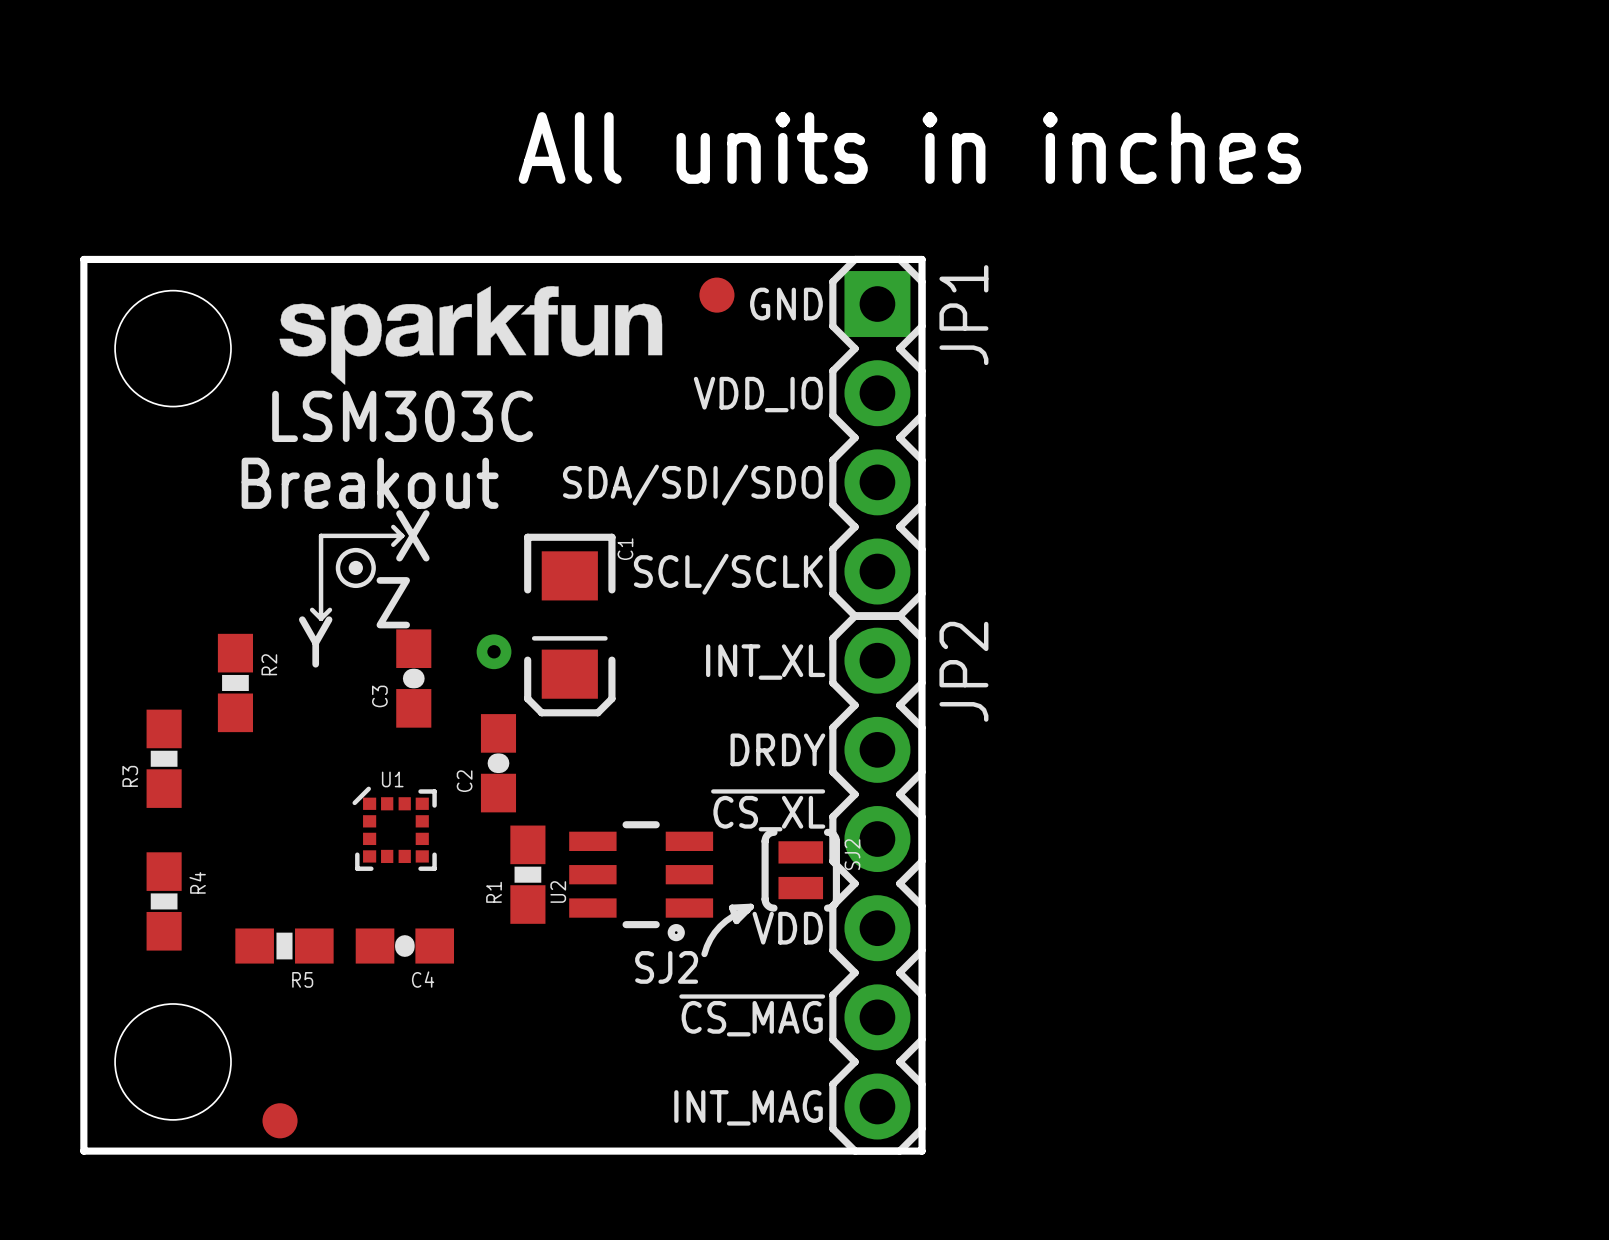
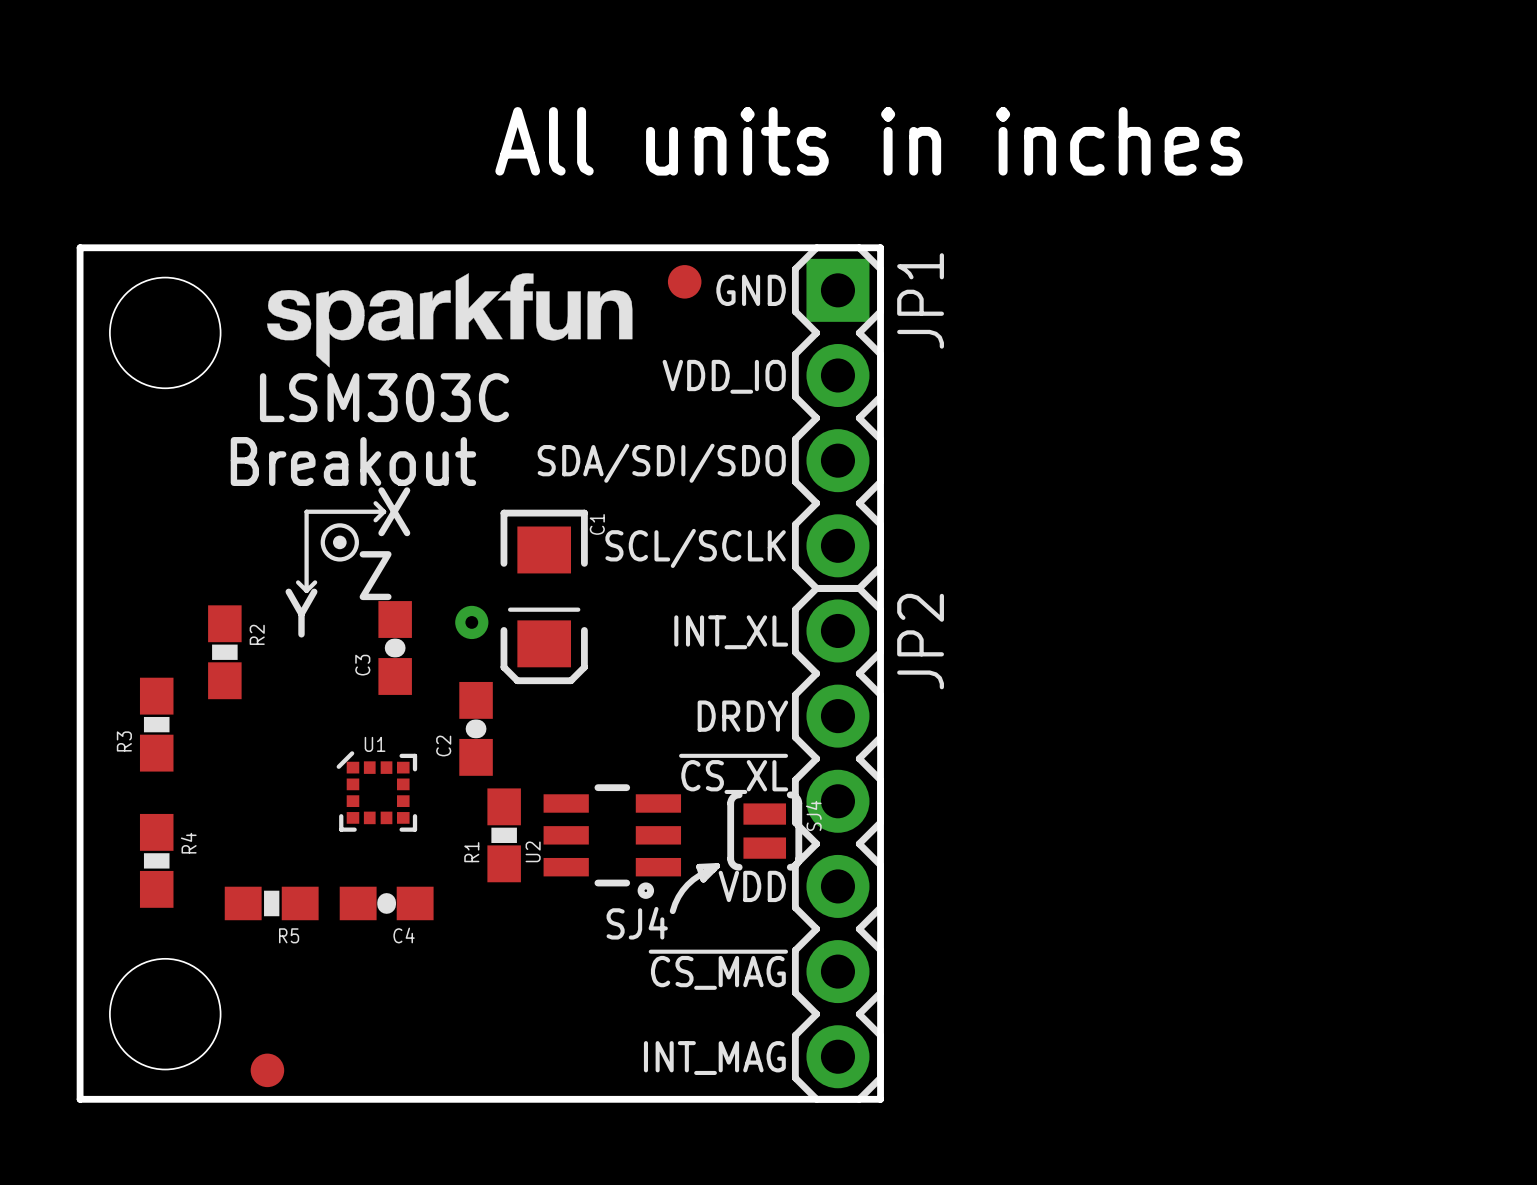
SJ2 name: SJ2 (852, 854) -> SJ4 (813, 815)
text: SJ2 (666, 967) -> SJ4 (637, 923)

